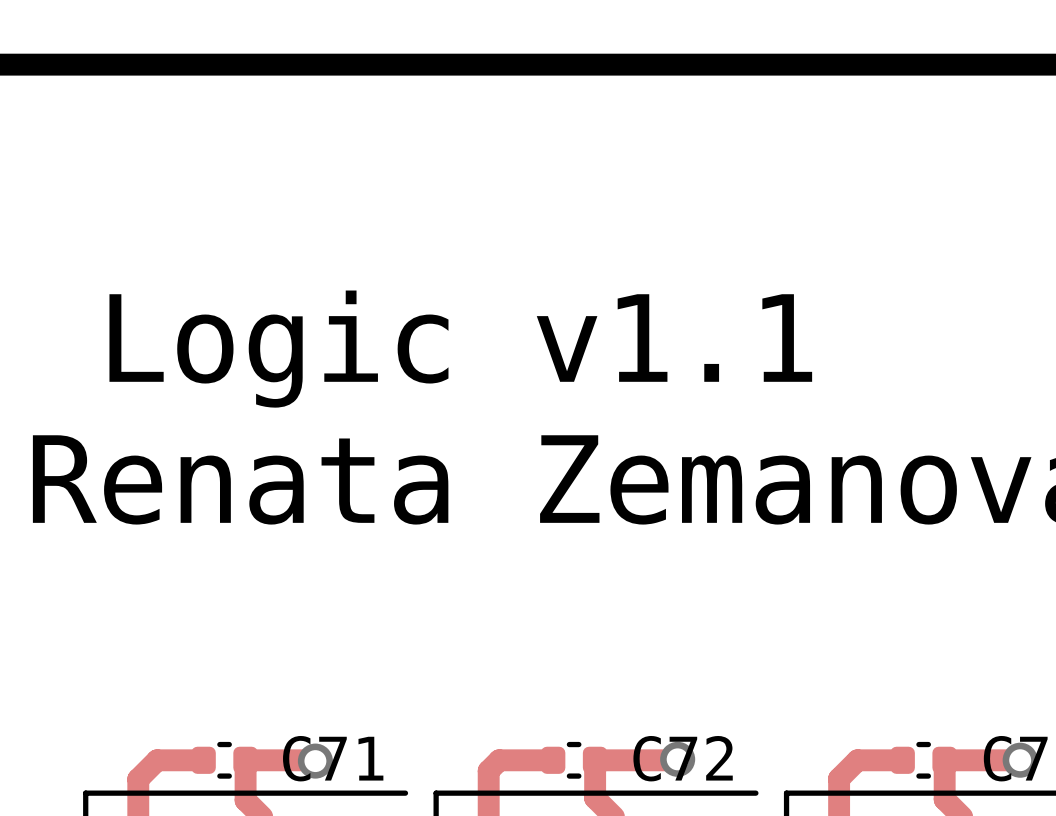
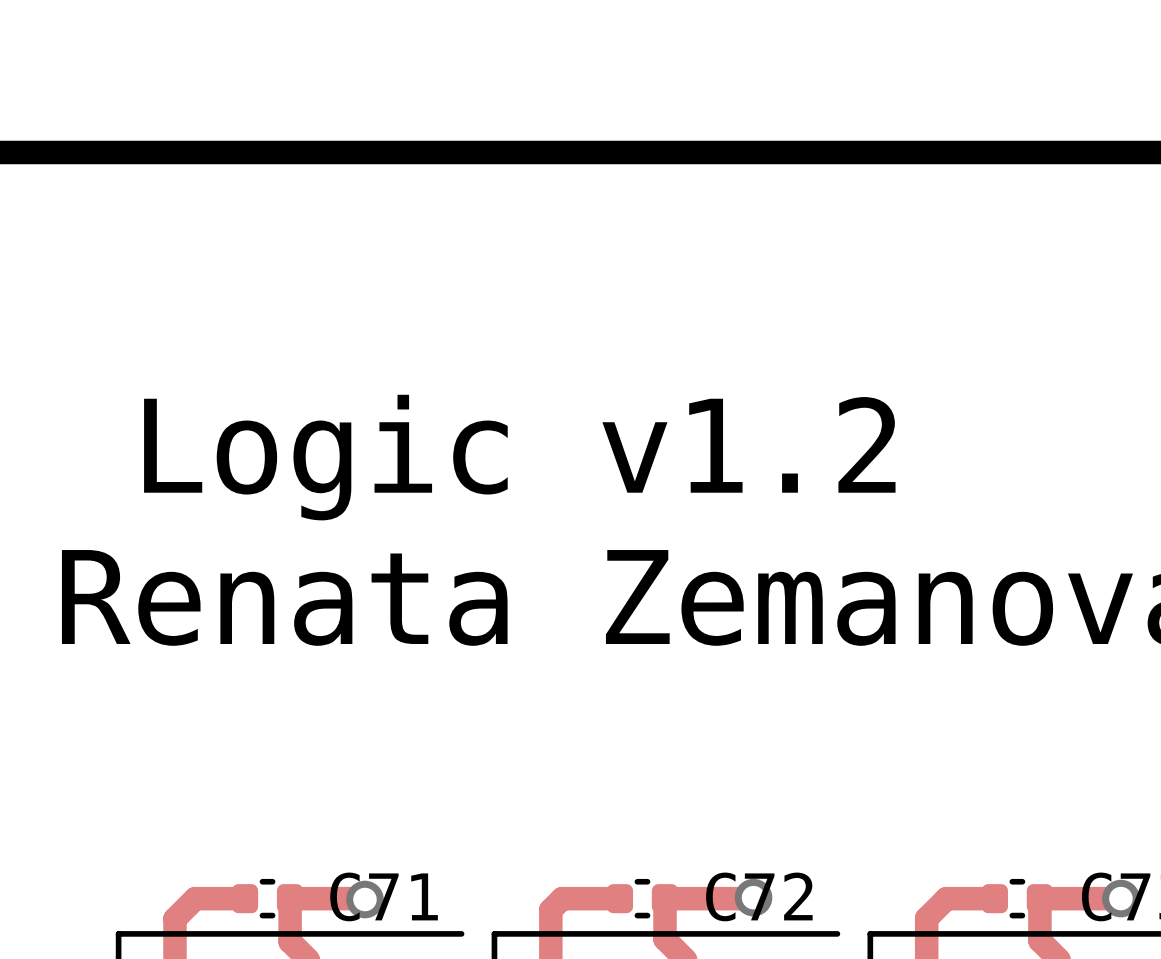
text: Logic v1.1 (460, 349) -> Logic v1.2 (519, 457)

